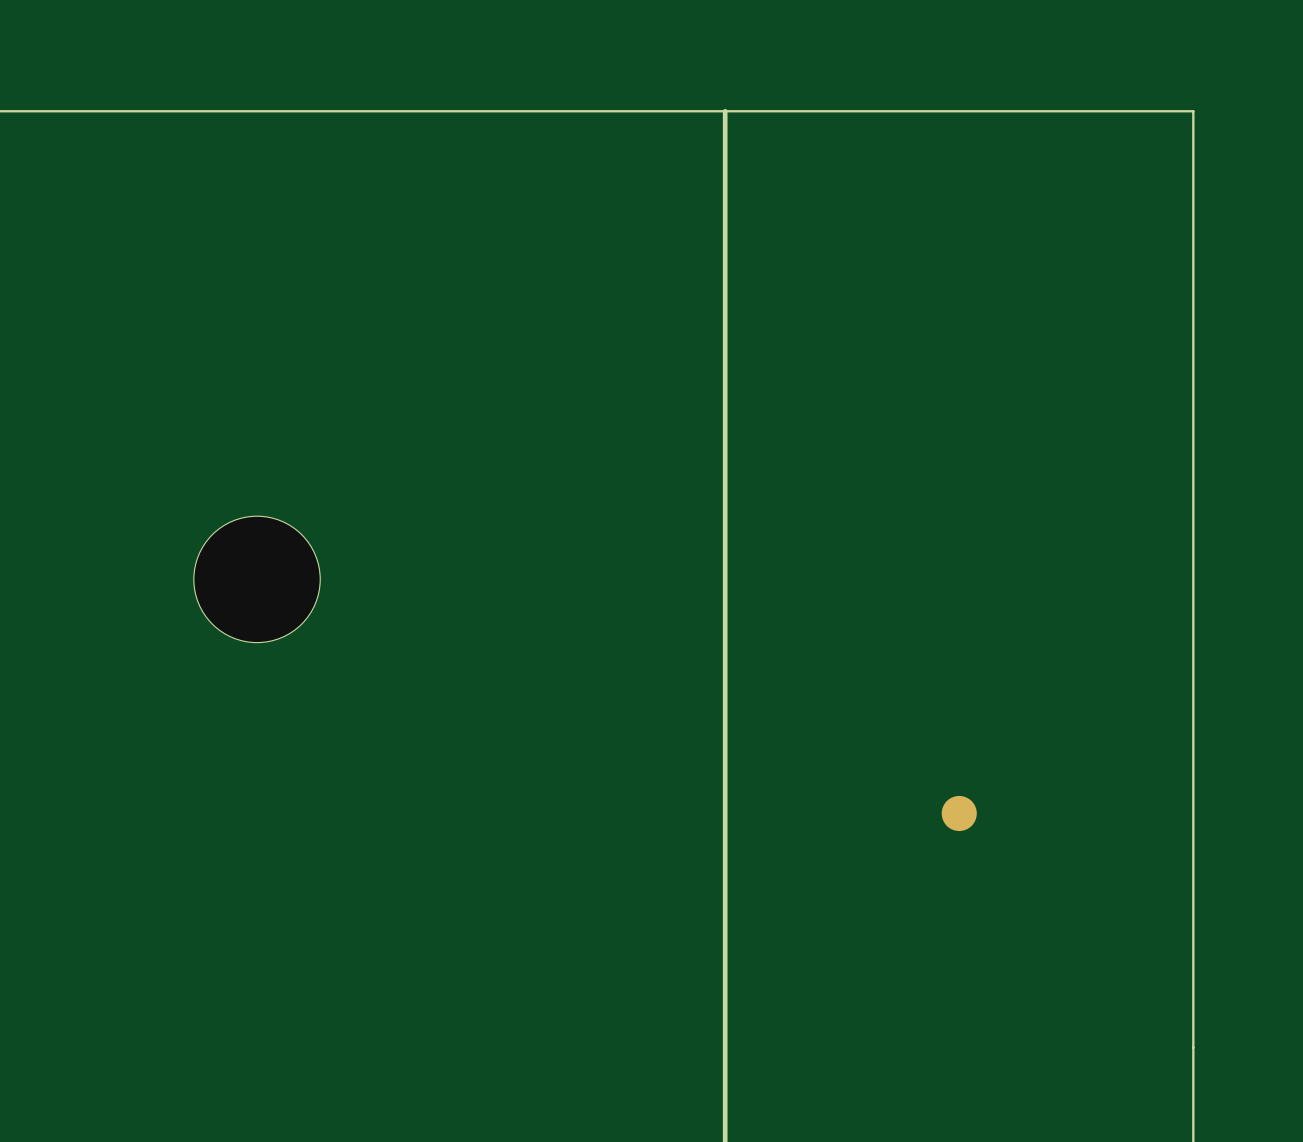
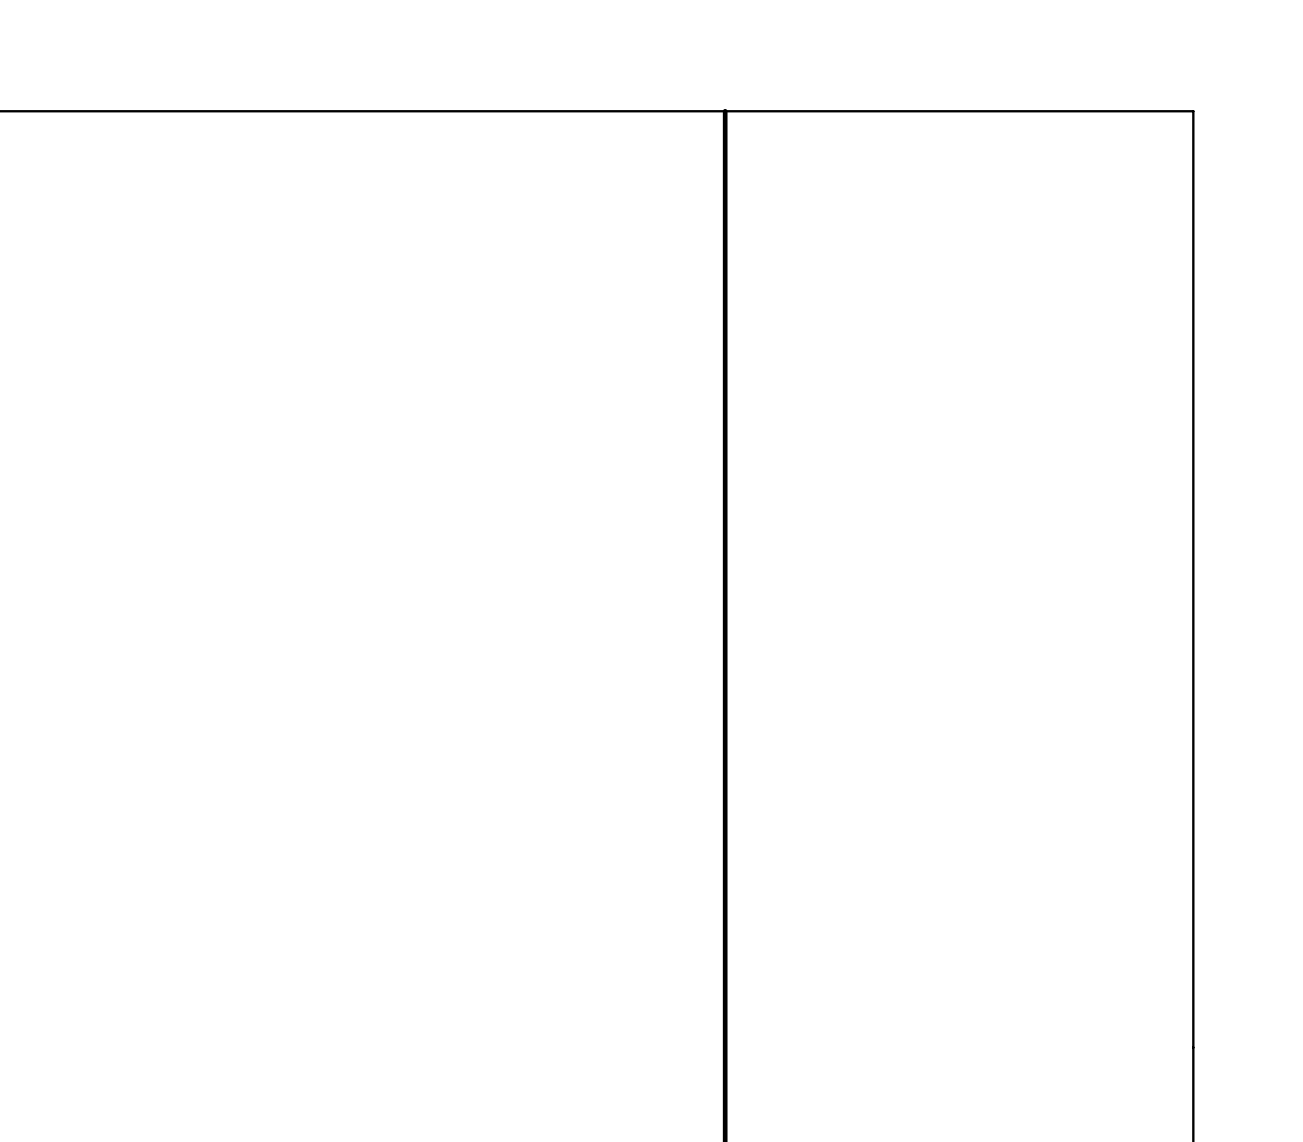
part: (257, 579) -> none
part: (959, 813) -> none

